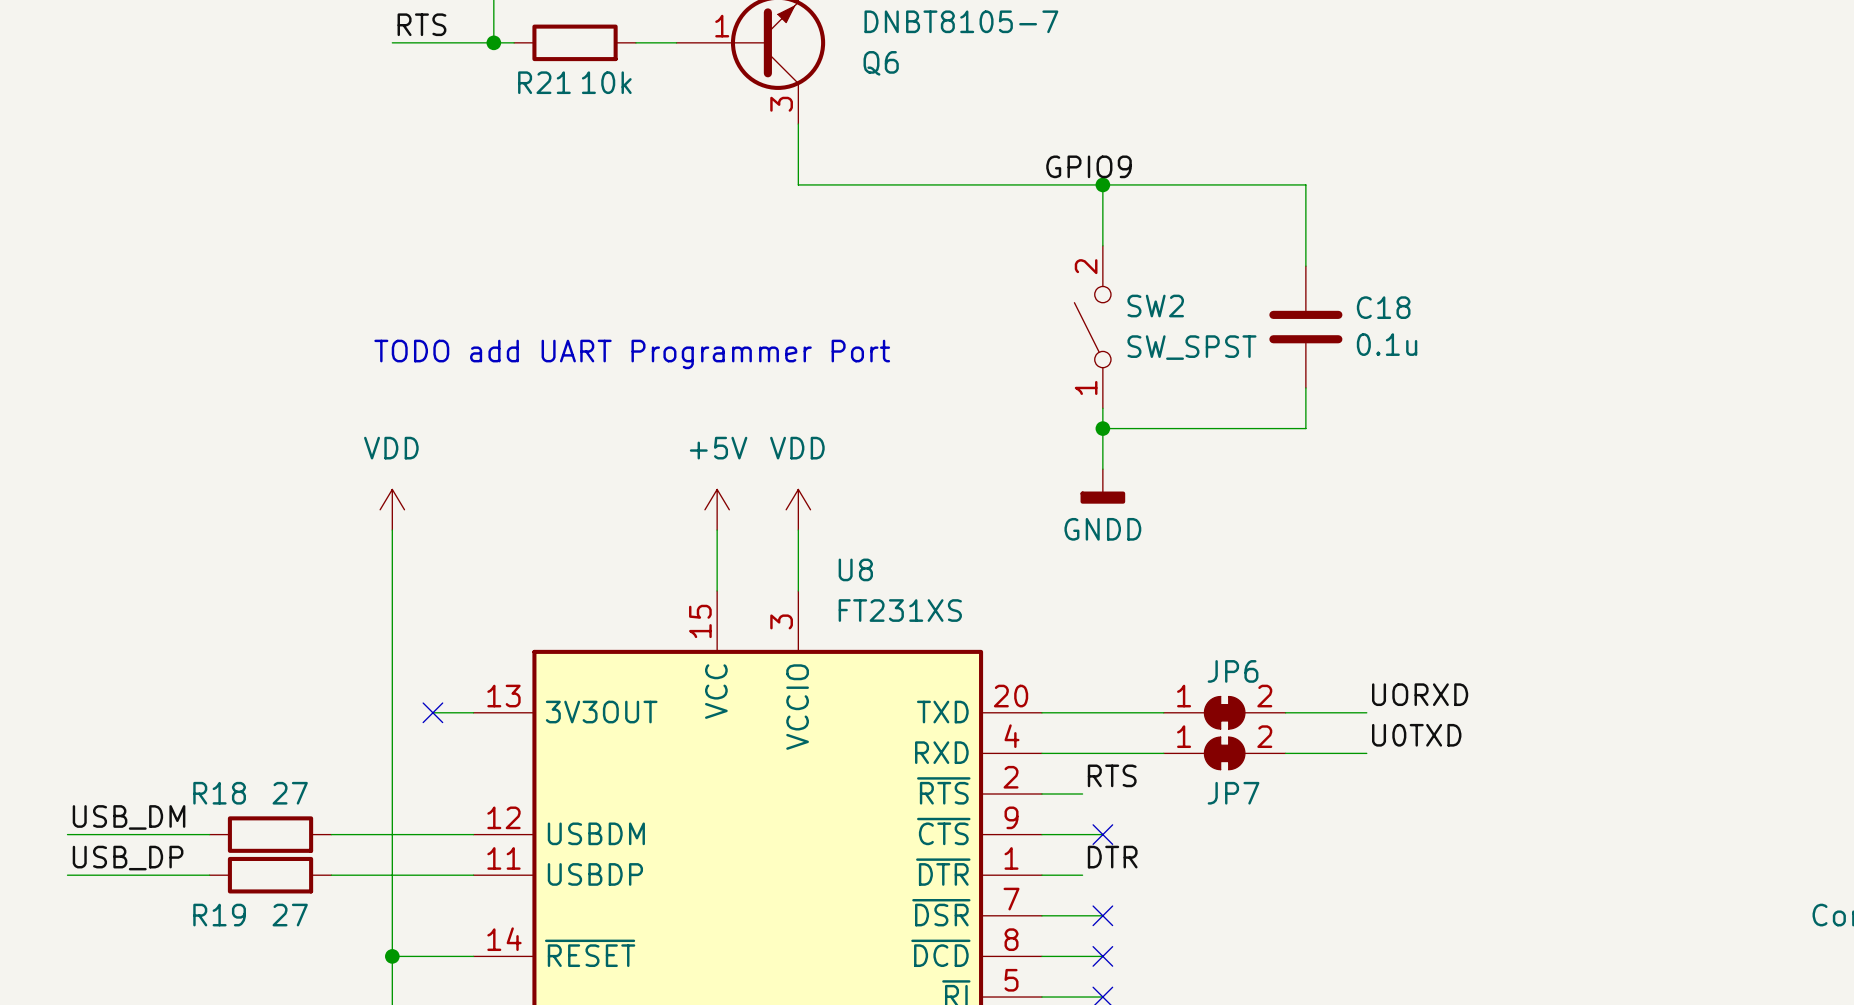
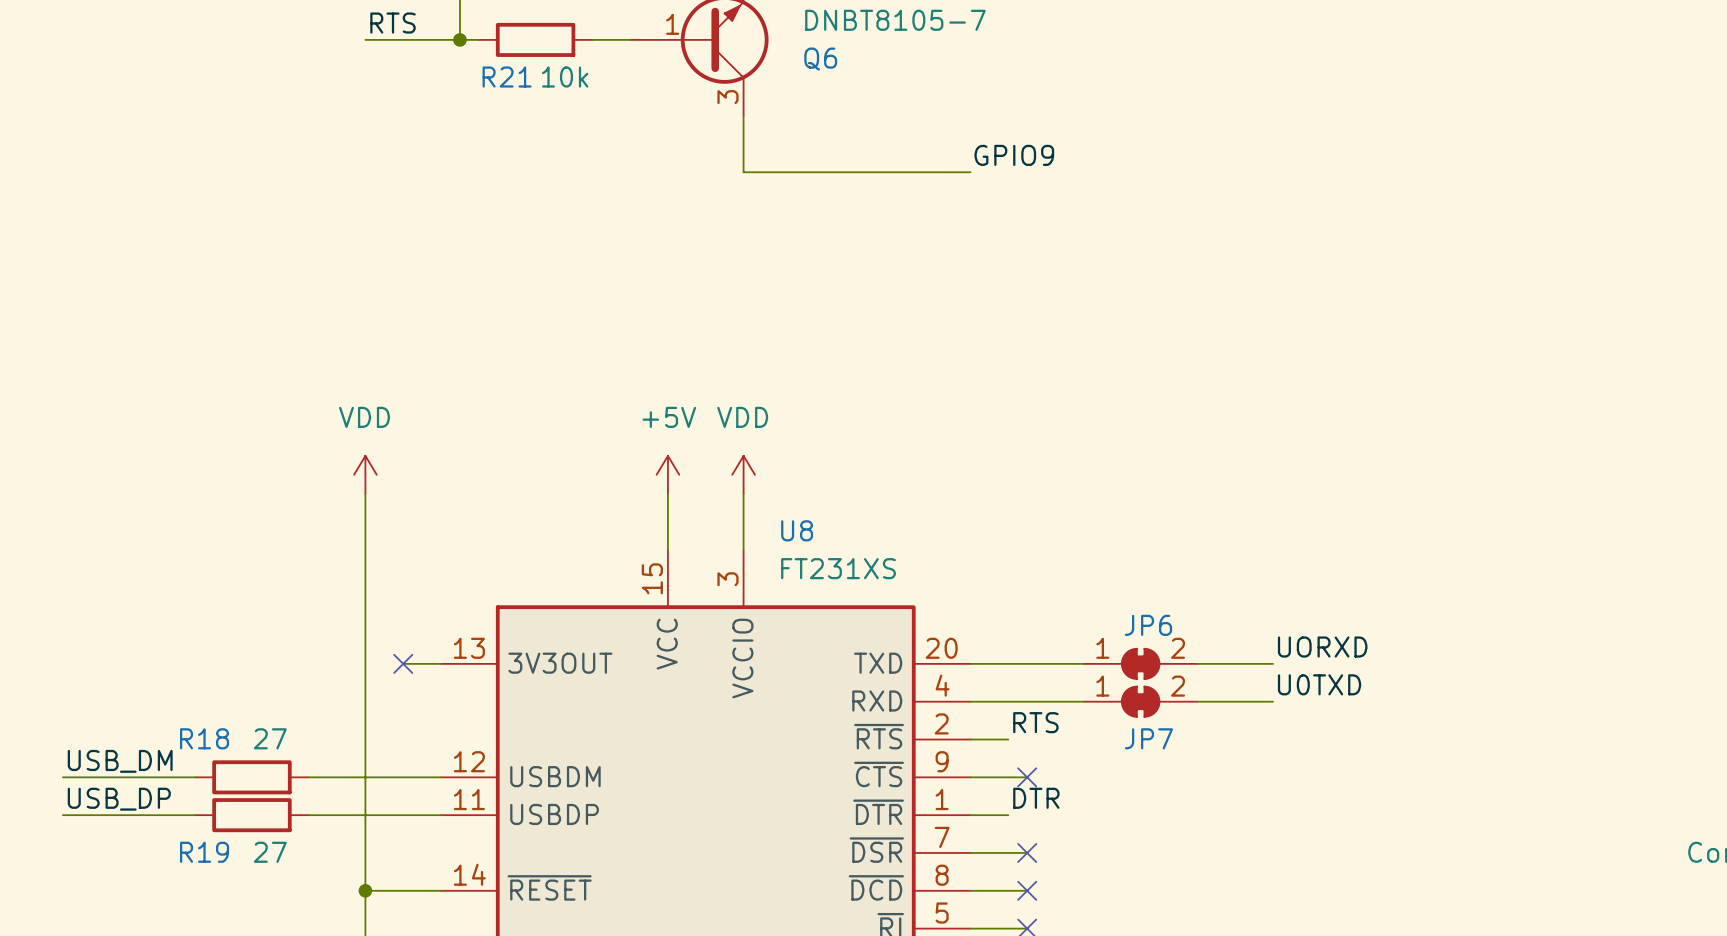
wire: (1041, 184) (1305, 184) (1305, 266) -> none
wire: (1102, 184) (1102, 245) -> none
junction: (1102, 184) -> none
SW2: SW_SPST (1092, 327) -> none
C18: 0.1u (1305, 327) -> none
text: TODO add UART Programmer Port (632, 354) -> none
wire: (1305, 387) (1305, 428) (1102, 428) -> none
wire: (1102, 408) (1102, 469) -> none
junction: (1102, 428) -> none
power symbol: GNDD (1102, 486) -> none

